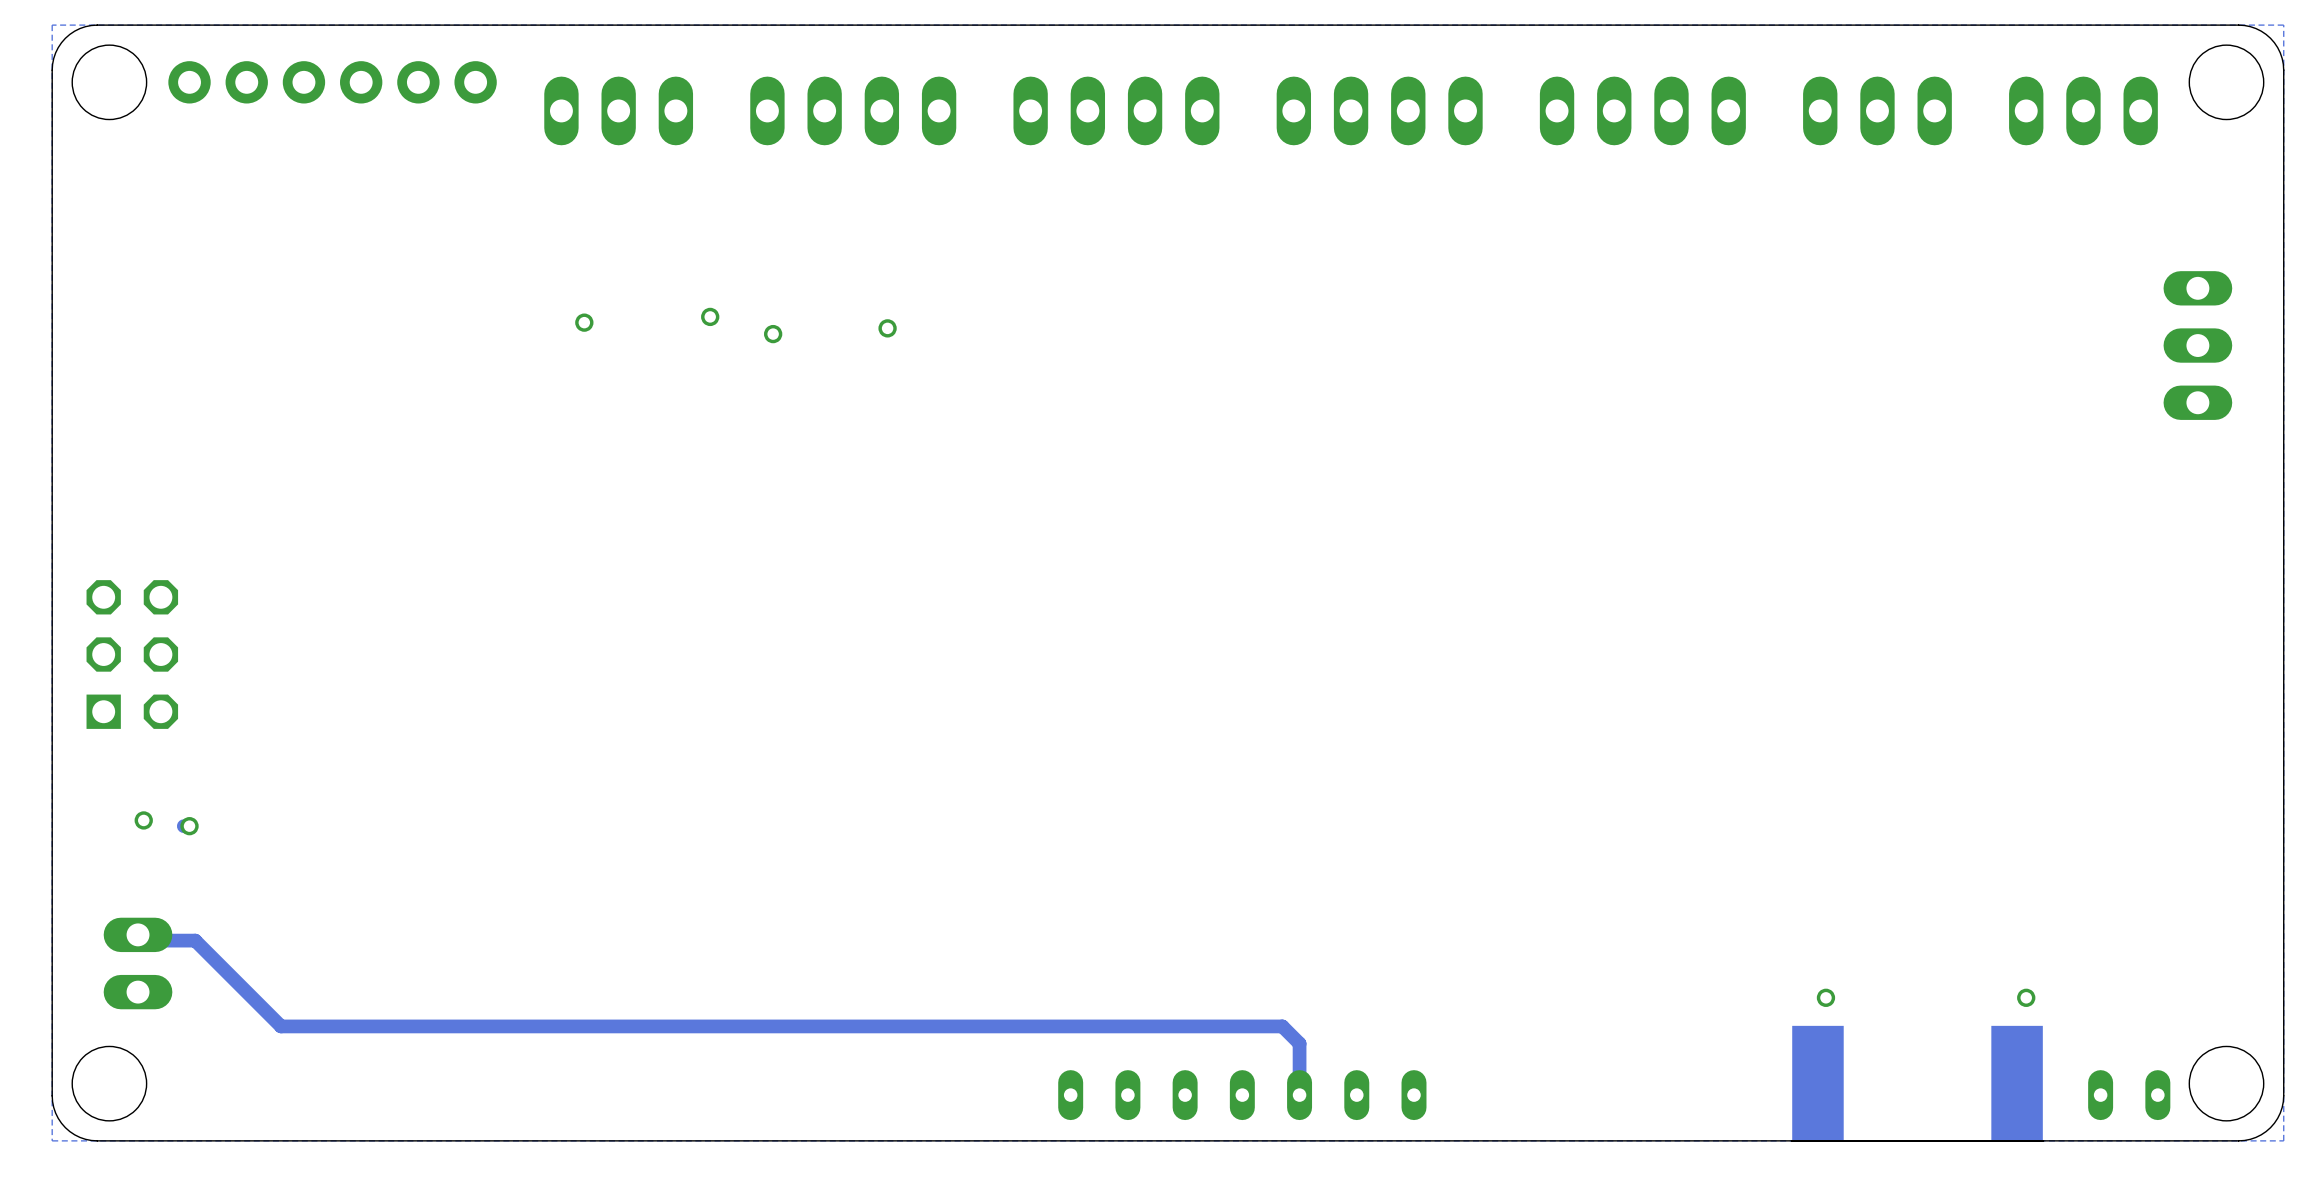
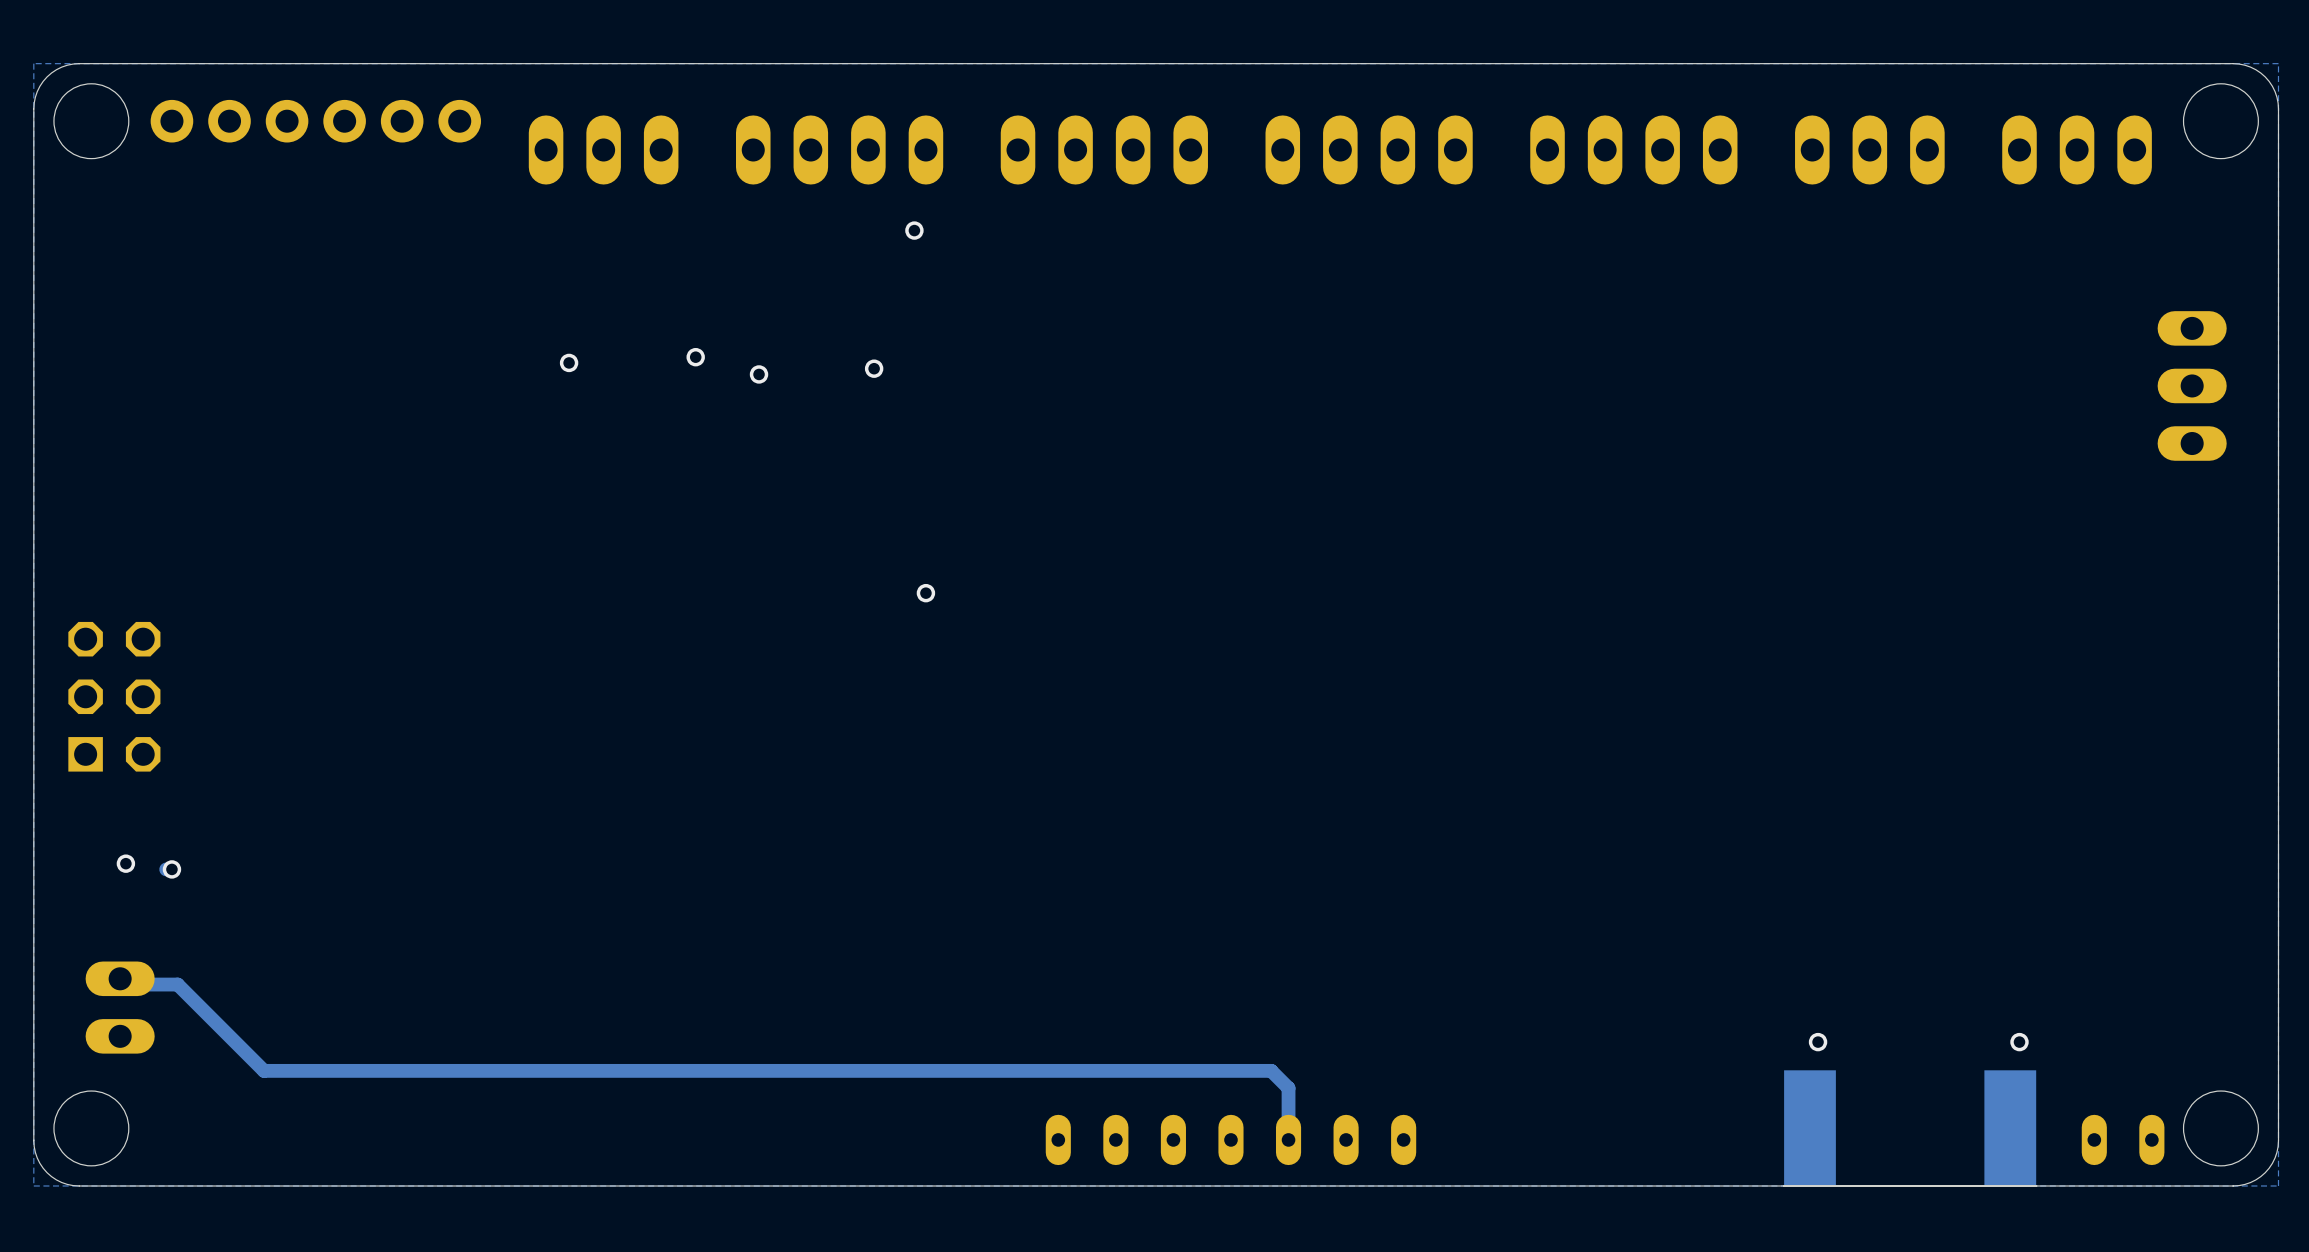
via: none -> (914, 230)
via: none -> (925, 593)

